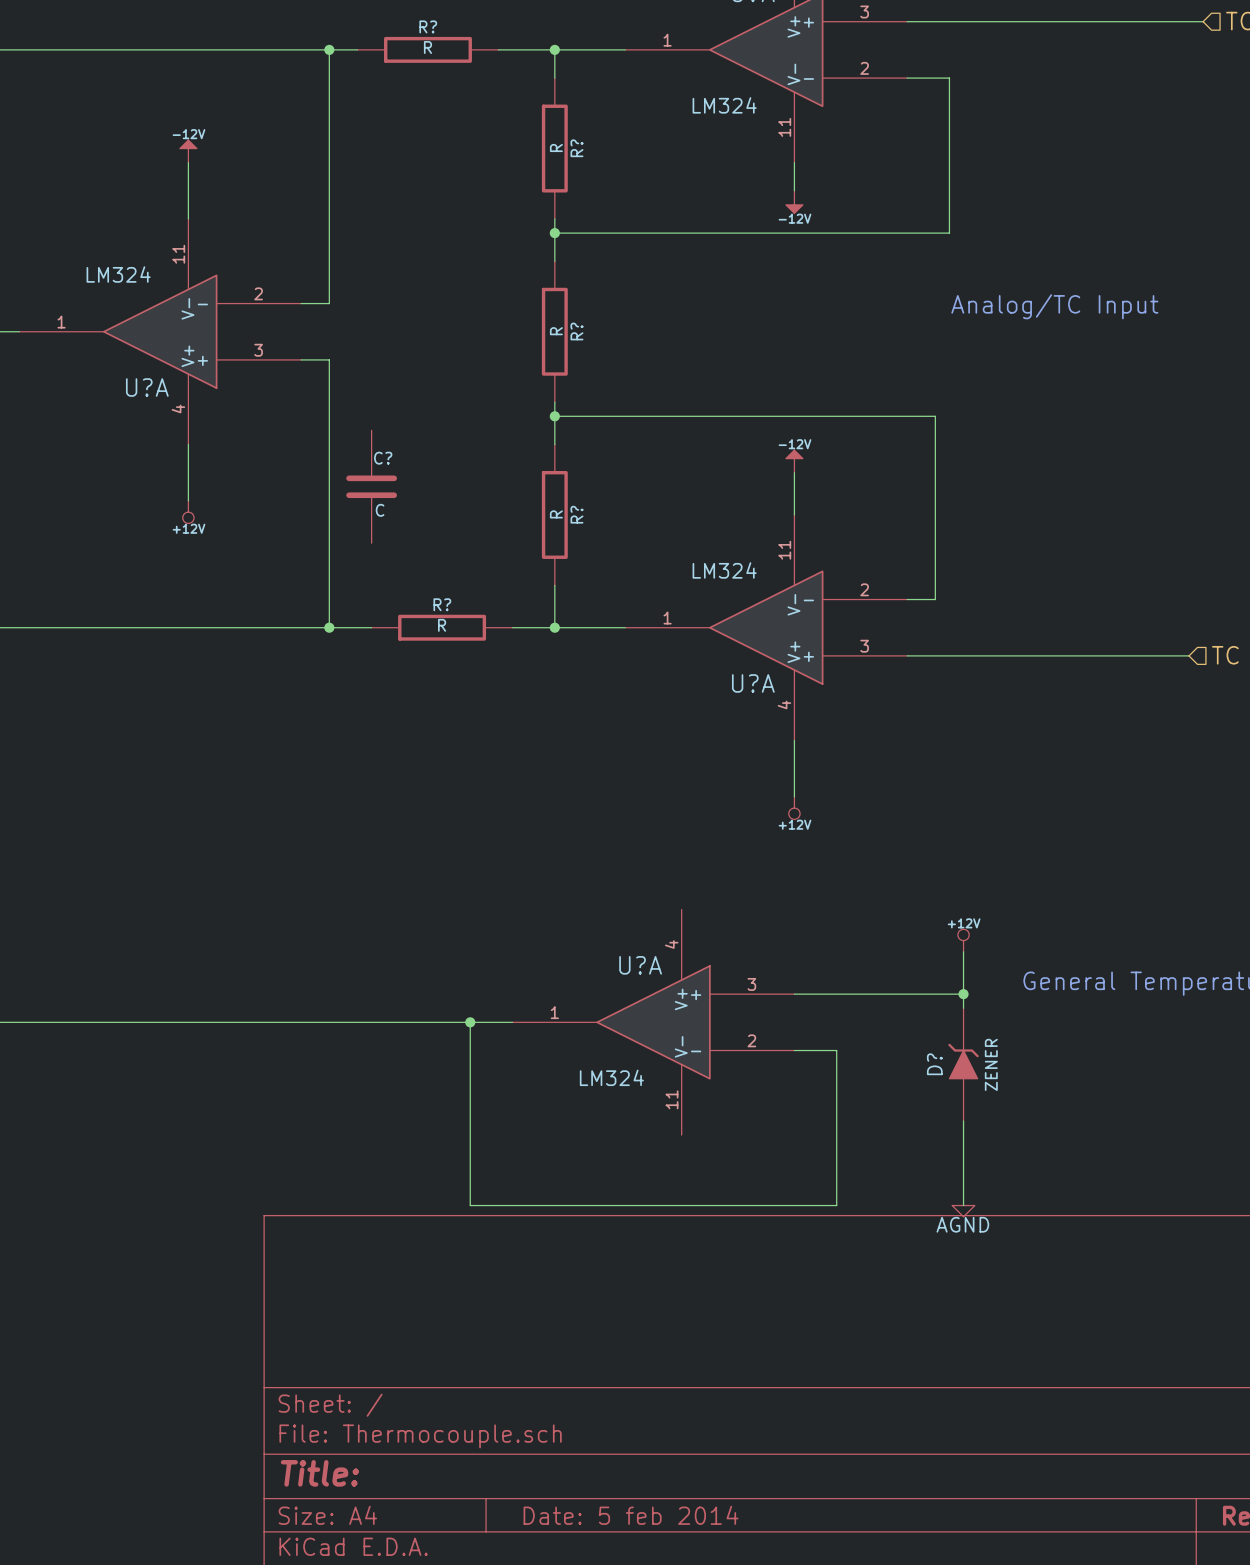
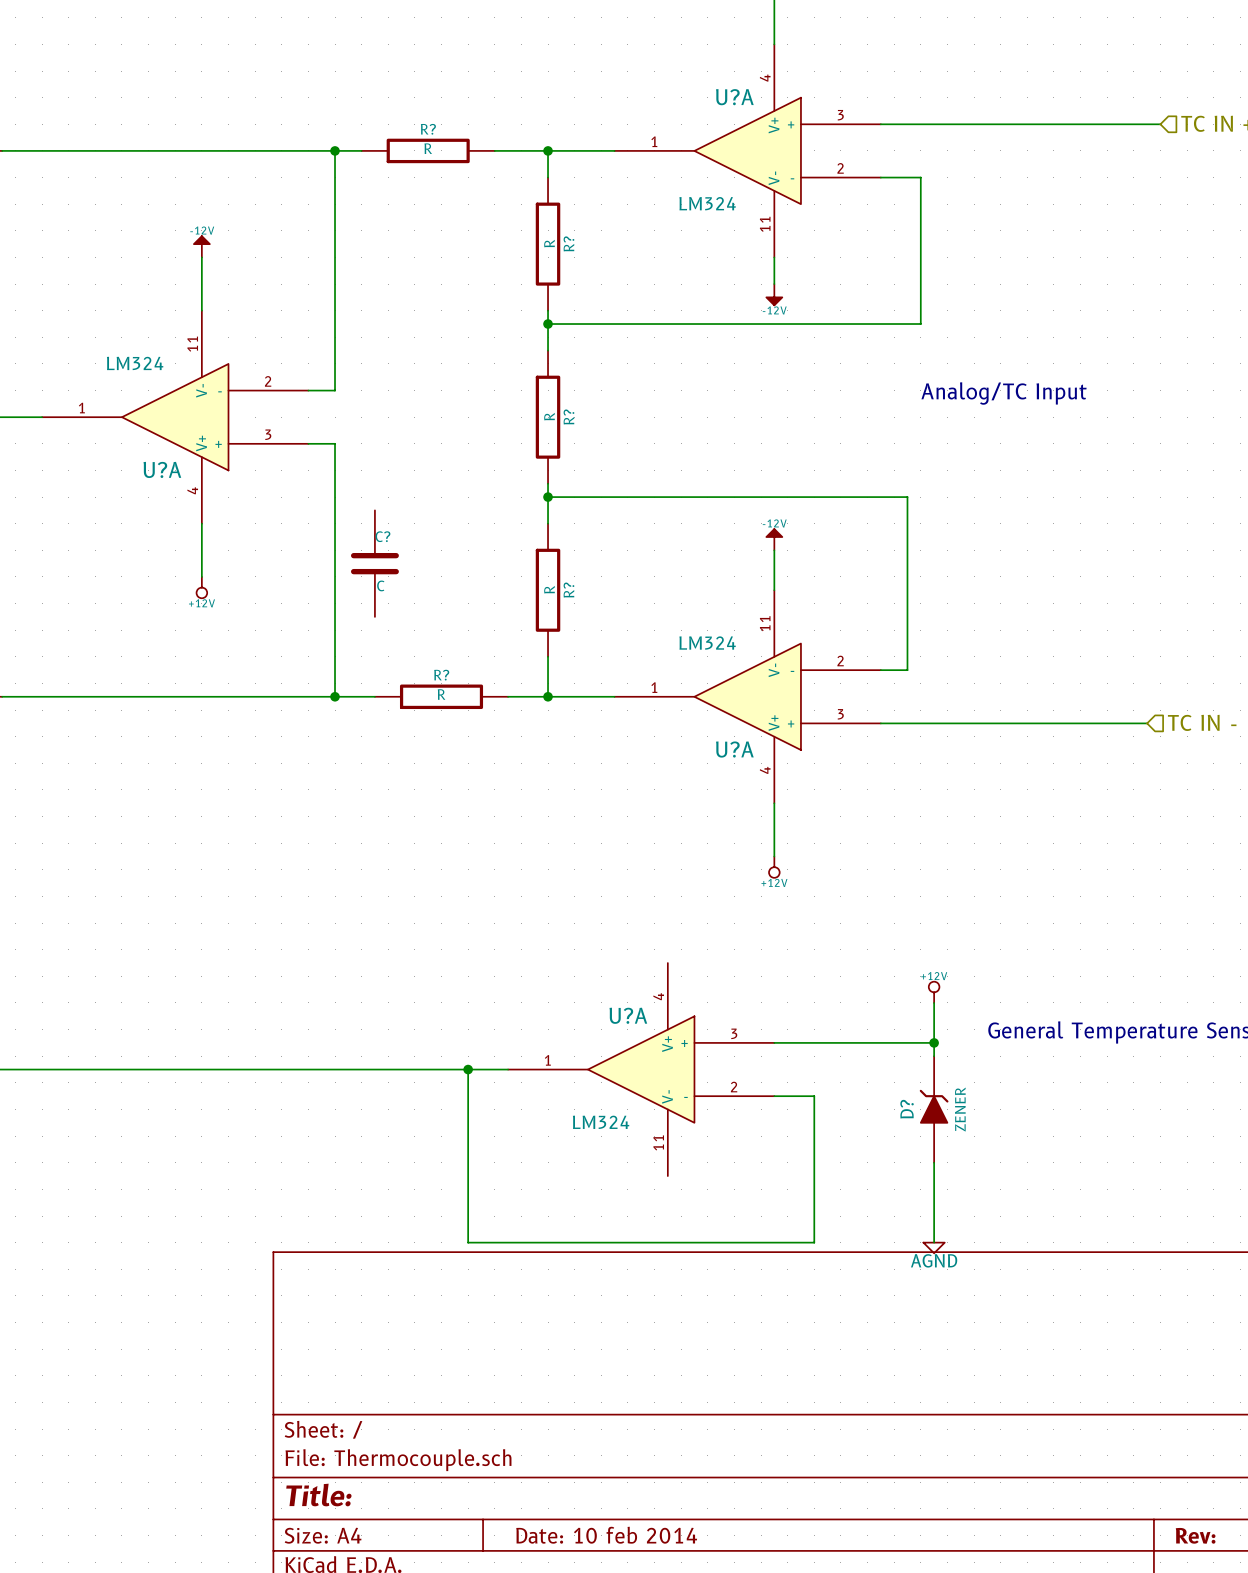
title block: Date: 5 feb 2014 (631, 1515) -> Date: 10 feb 2014 (606, 1535)

